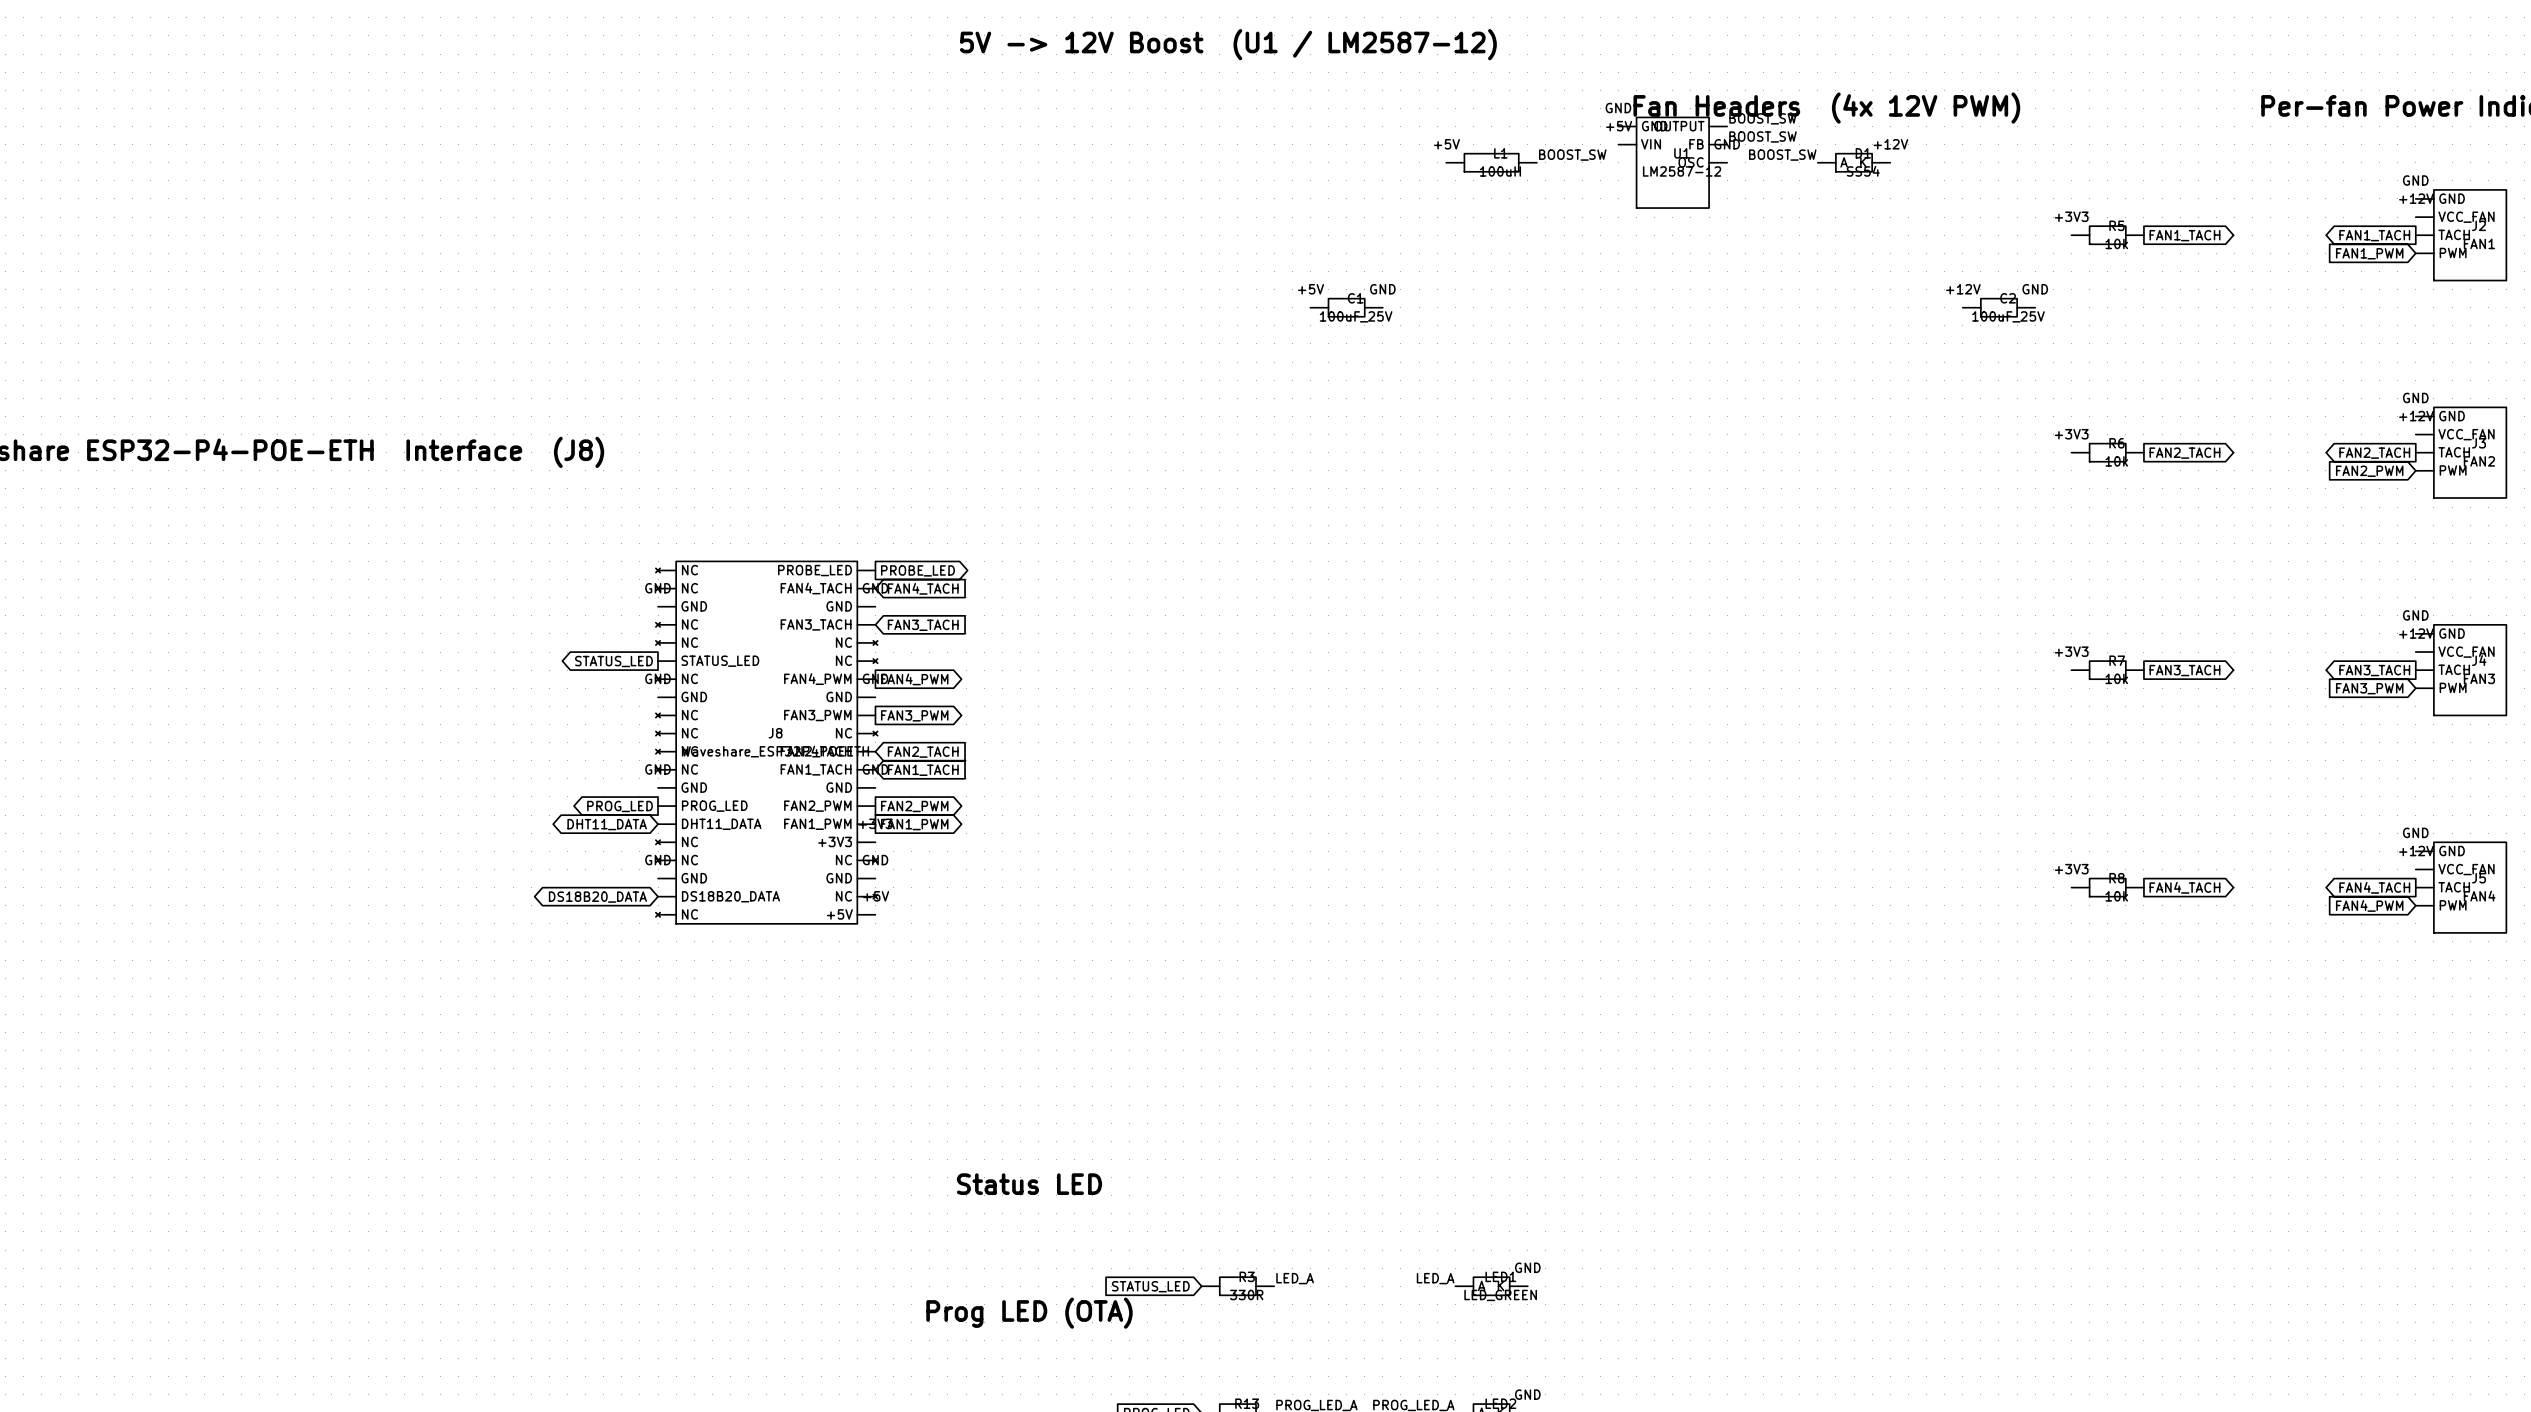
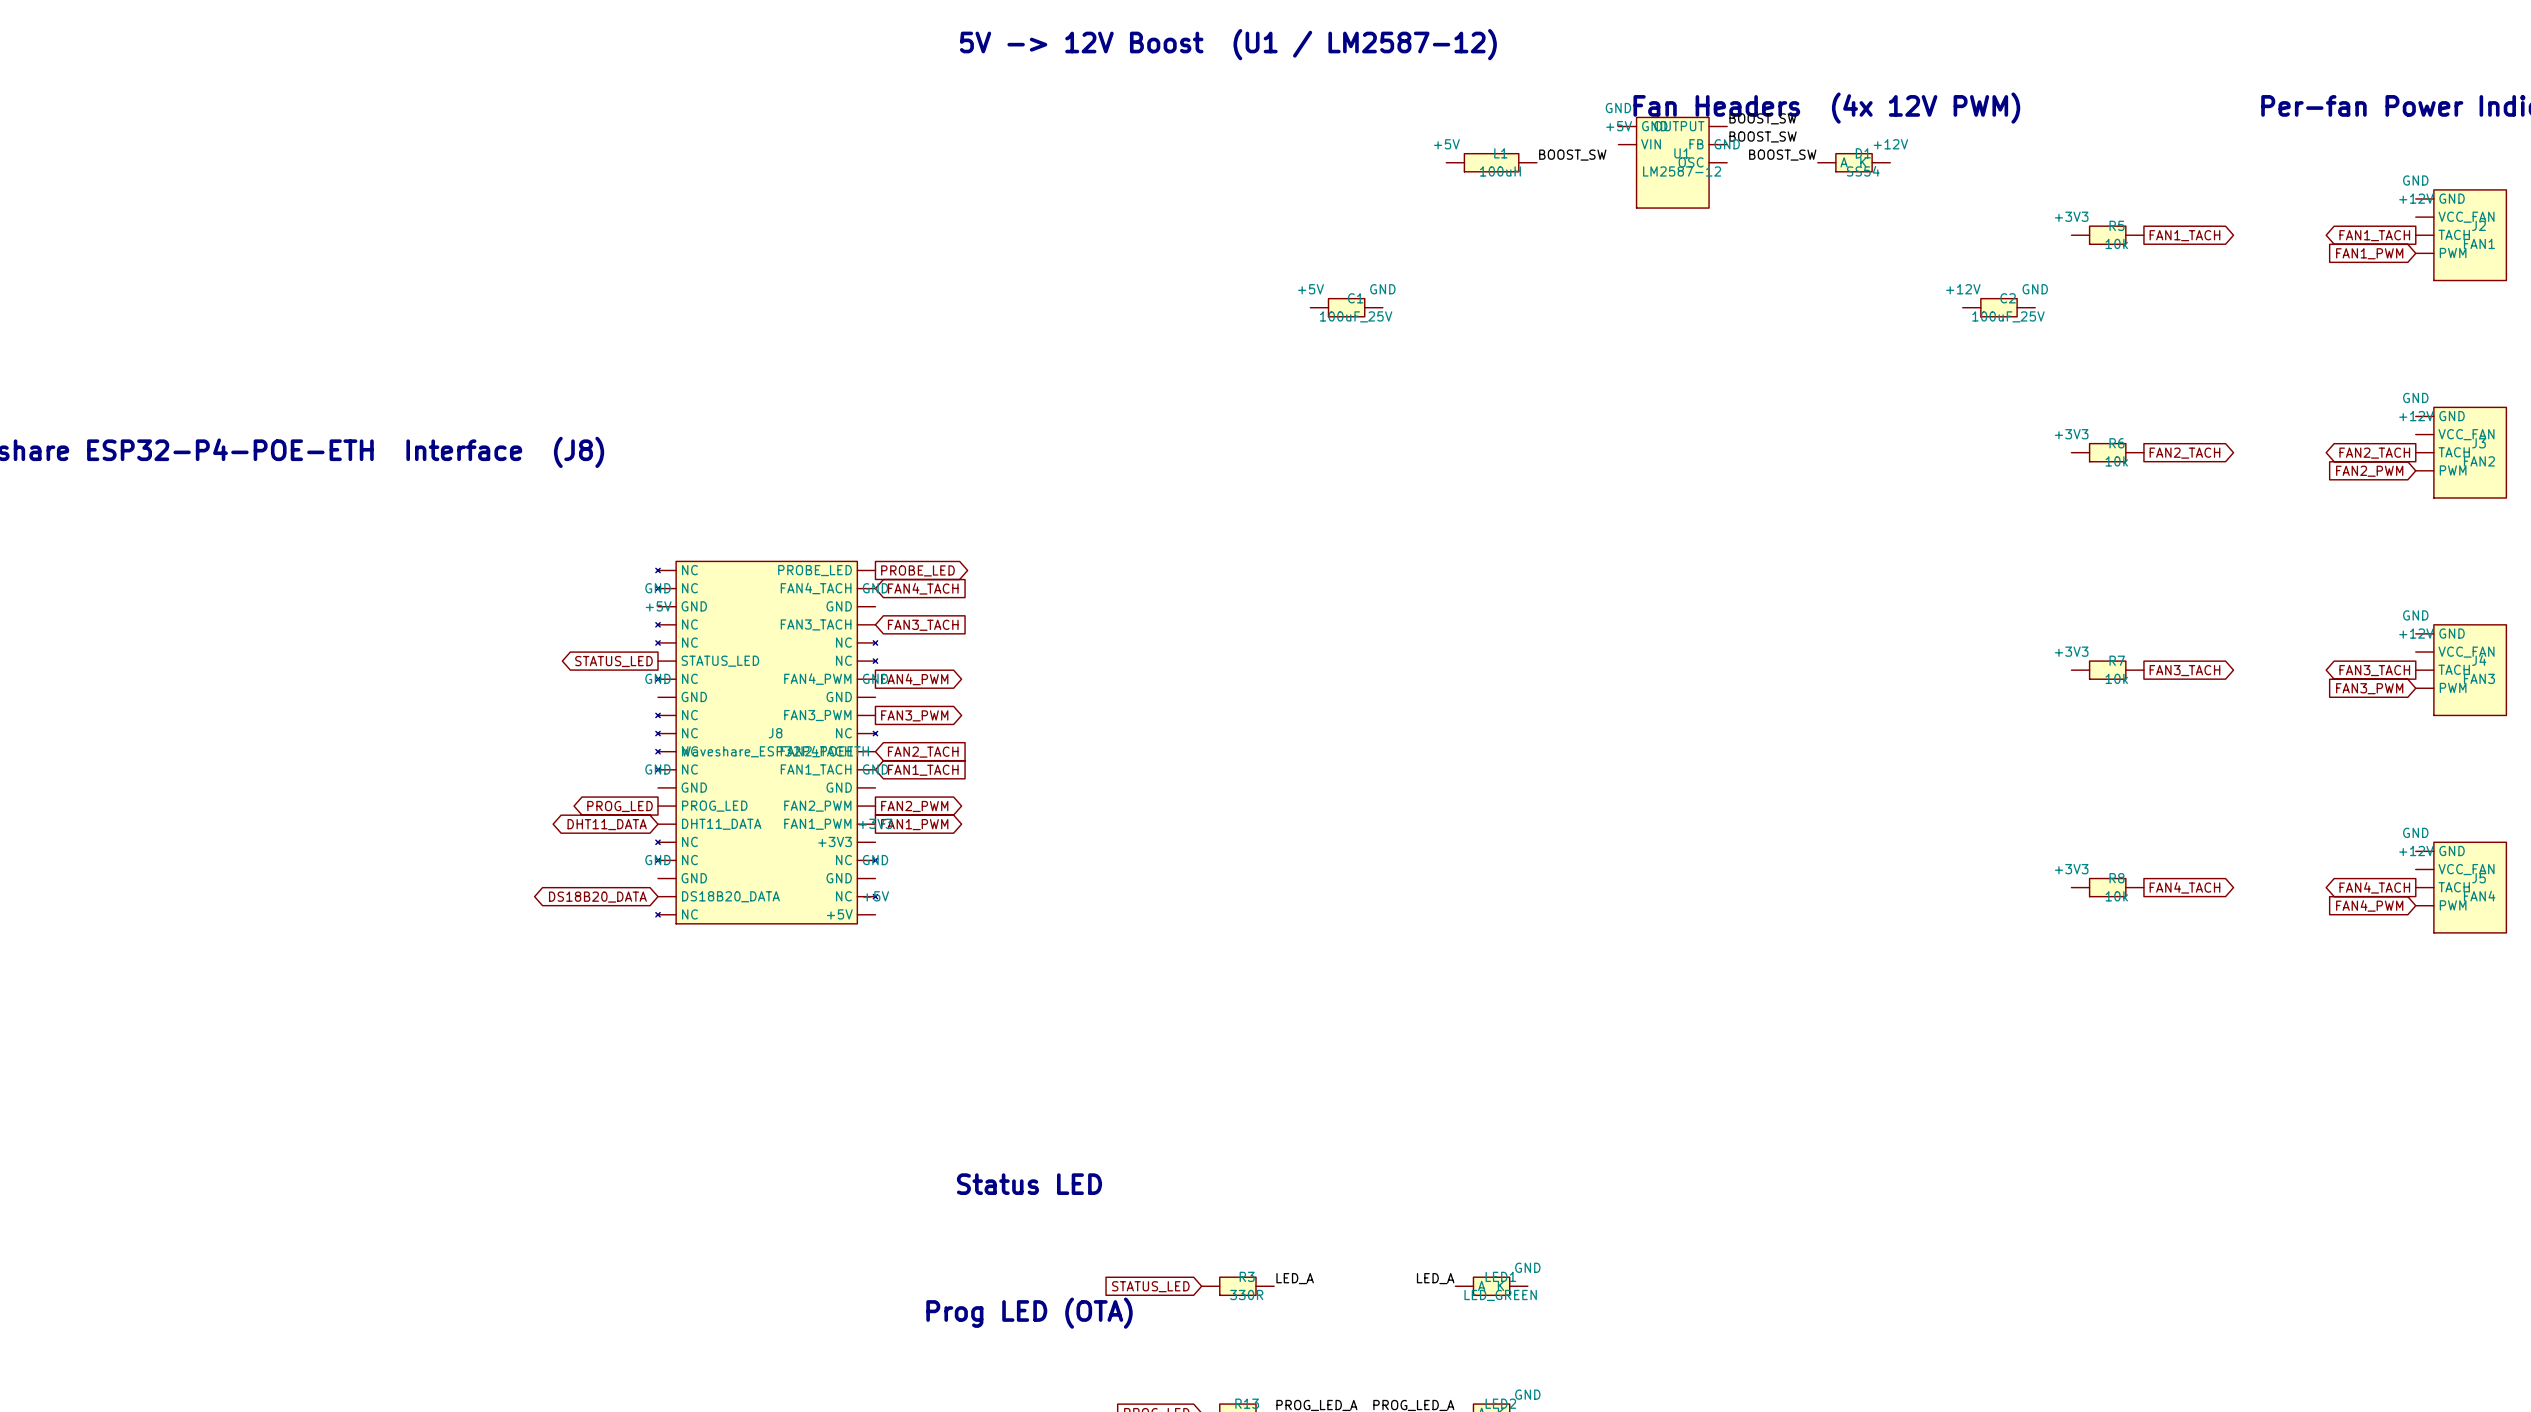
power symbol: none -> +5V (658, 606)

